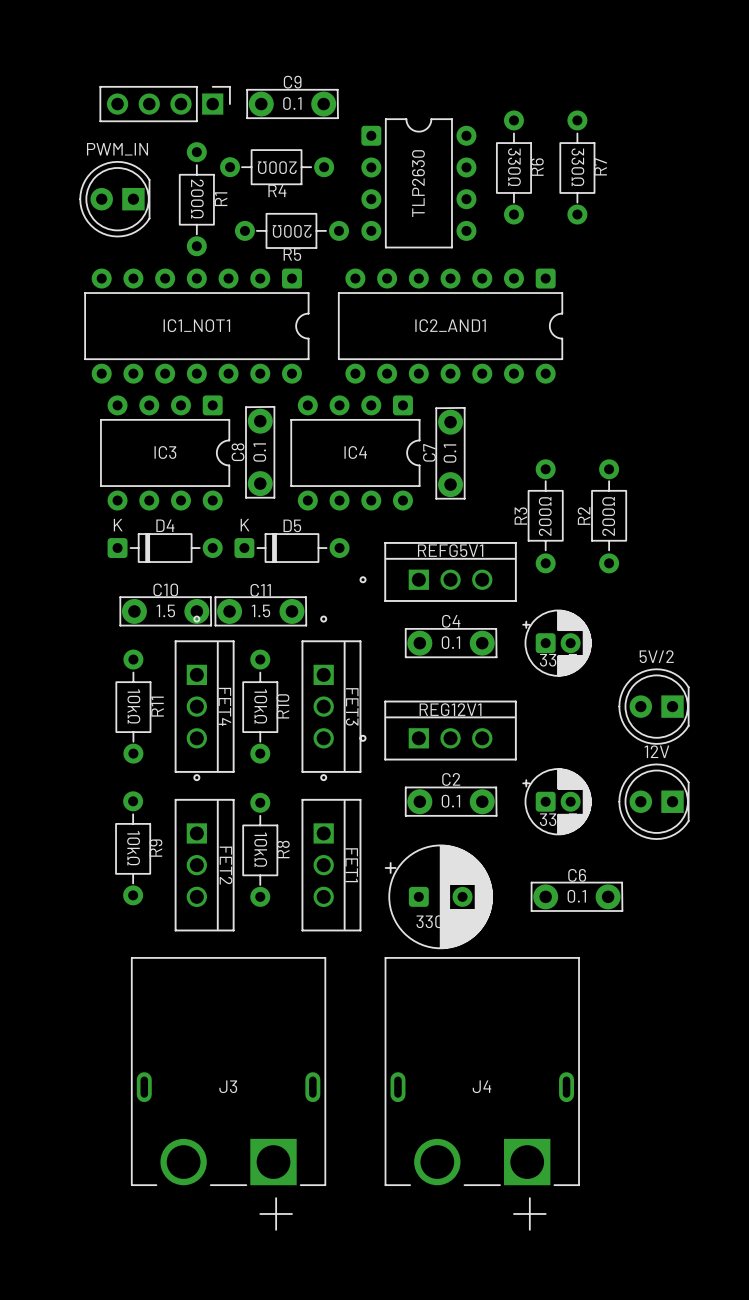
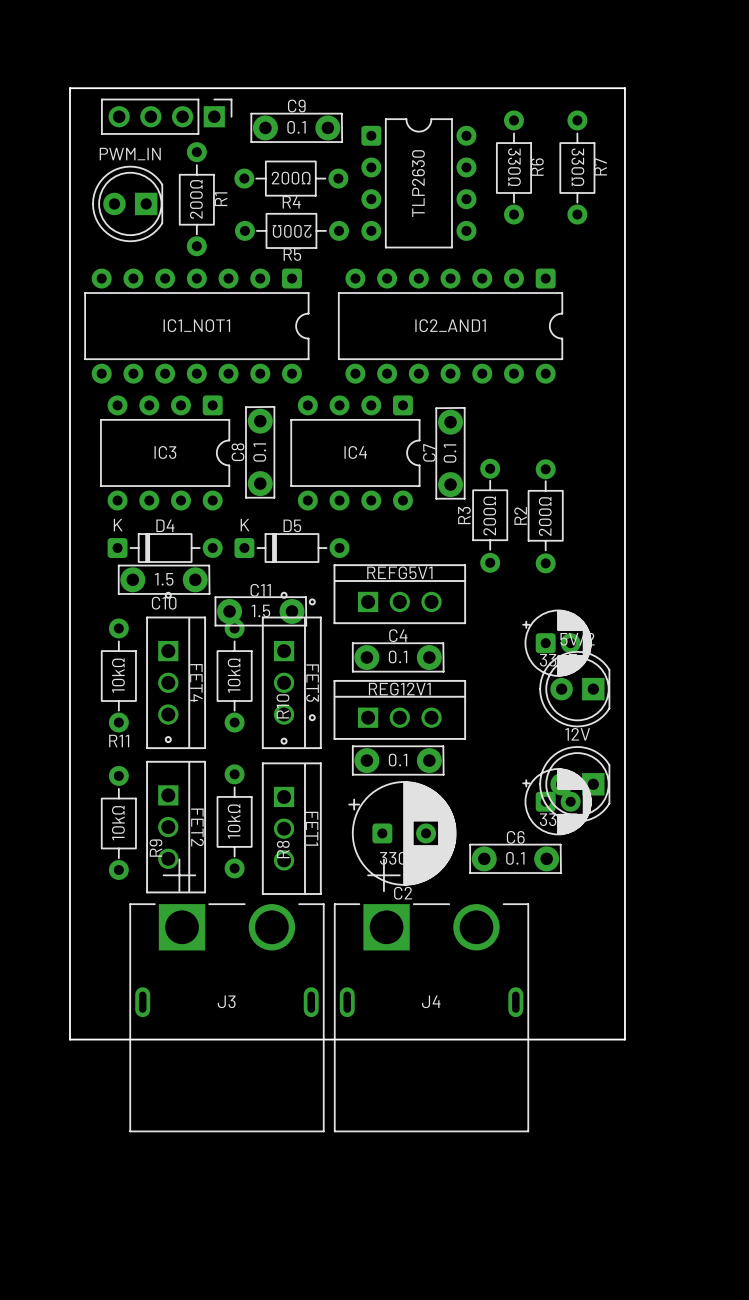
board edge: none -> (70, 88) (624, 88) (624, 1039) (70, 1039) (70, 88)
C9 position: (292, 103) -> (296, 127)
part position: (165, 104) -> (166, 116)
R4 position: (277, 167) -> (291, 178)
R4 value rotation: 0° (277, 167) -> 180° (291, 178)
part position: (114, 199) -> (127, 203)
R1 value rotation: 0° (197, 199) -> 180° (196, 199)
R3: none -> 200Ω (490, 515)
R3 name: R3 (520, 516) -> R2 (520, 516)
R2: 200Ω (609, 516) -> none
REFG5V1 position: (438, 571) -> (387, 594)
C10 name position: C10 (165, 589) -> C10 (164, 603)
C10 position: (165, 611) -> (164, 579)
C4 position: (451, 643) -> (398, 657)
FET4 position: (204, 694) -> (176, 670)
FET3 position: (331, 694) -> (291, 670)
R11 position: (133, 706) -> (118, 675)
R11 value rotation: 0° (133, 706) -> 180° (118, 675)
R11 name rotation: 0° (157, 706) -> 90° clockwise (119, 741)
R11 name position: R11 (157, 706) -> R11 (119, 741)
R10 position: (260, 706) -> (234, 675)
R10 value rotation: 0° (260, 706) -> 180° (234, 675)
part position: (653, 706) -> (574, 689)
REG12V1 position: (438, 730) -> (387, 709)
C2 name position: C2 (451, 779) -> C2 (403, 893)
C2 position: (451, 801) -> (398, 760)
part position: (653, 801) -> (574, 784)
R9 position: (133, 848) -> (118, 822)
R9 value rotation: 0° (133, 848) -> 180° (118, 823)
R8 position: (260, 849) -> (234, 821)
R8 value rotation: 0° (260, 849) -> 180° (234, 821)
FET2 position: (204, 852) -> (176, 814)
FET1 position: (331, 852) -> (291, 816)
part position: (438, 896) -> (402, 833)
C6 position: (576, 896) -> (515, 858)
J3 rotation: 0° (228, 1093) -> 180° (226, 995)
J4 rotation: 0° (482, 1093) -> 180° (431, 995)

